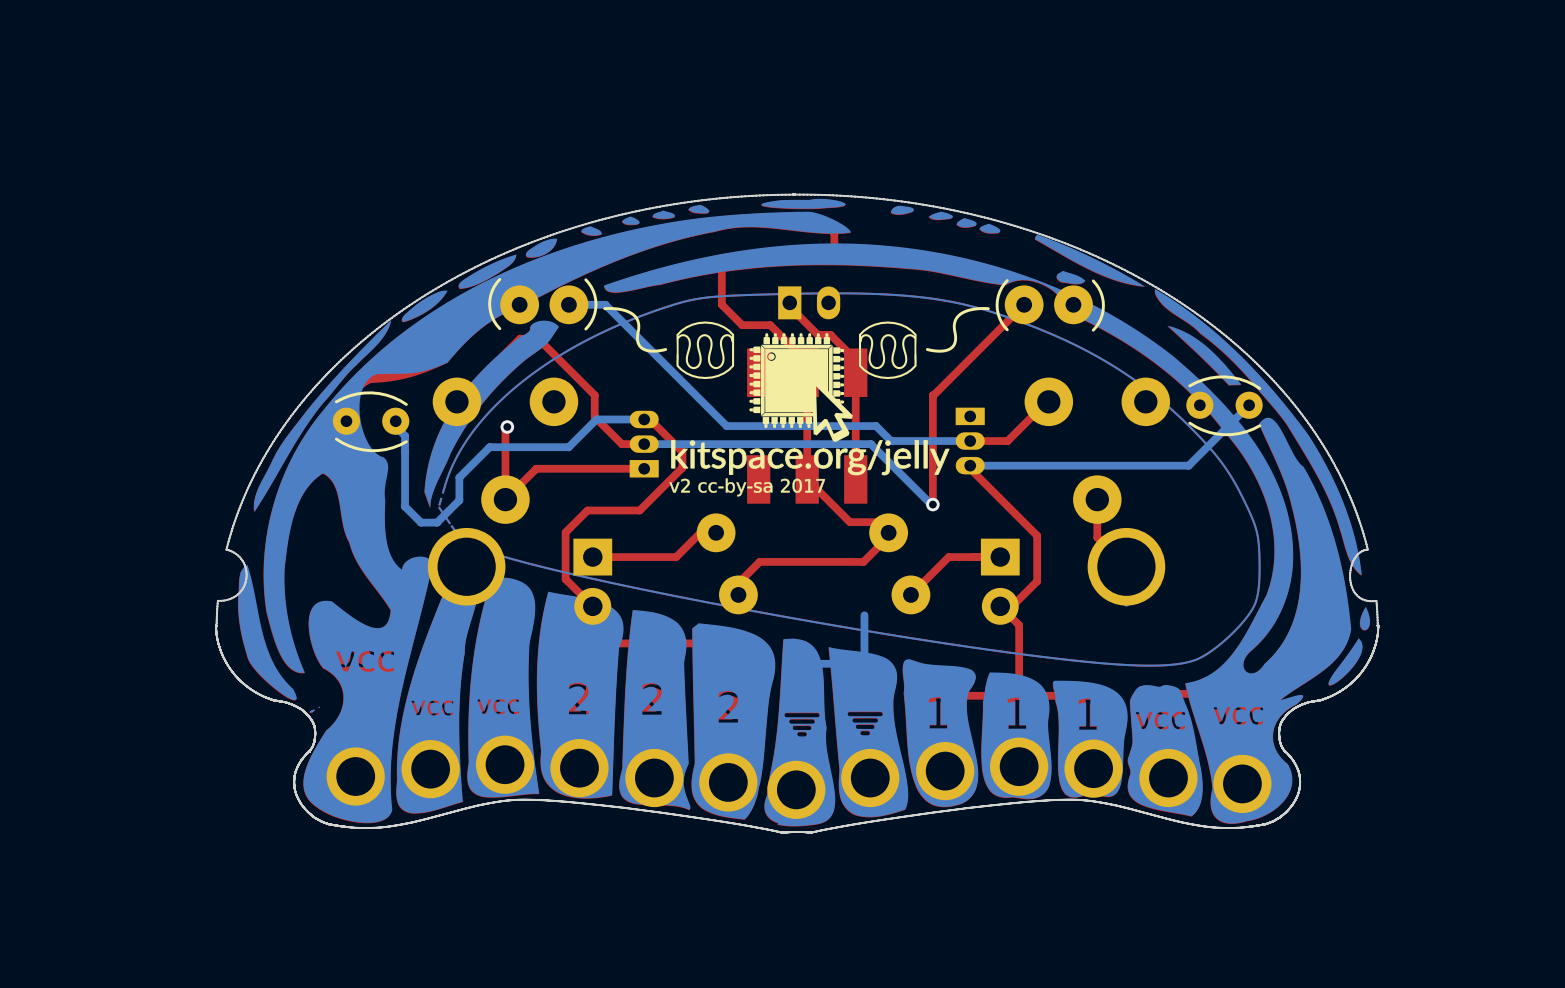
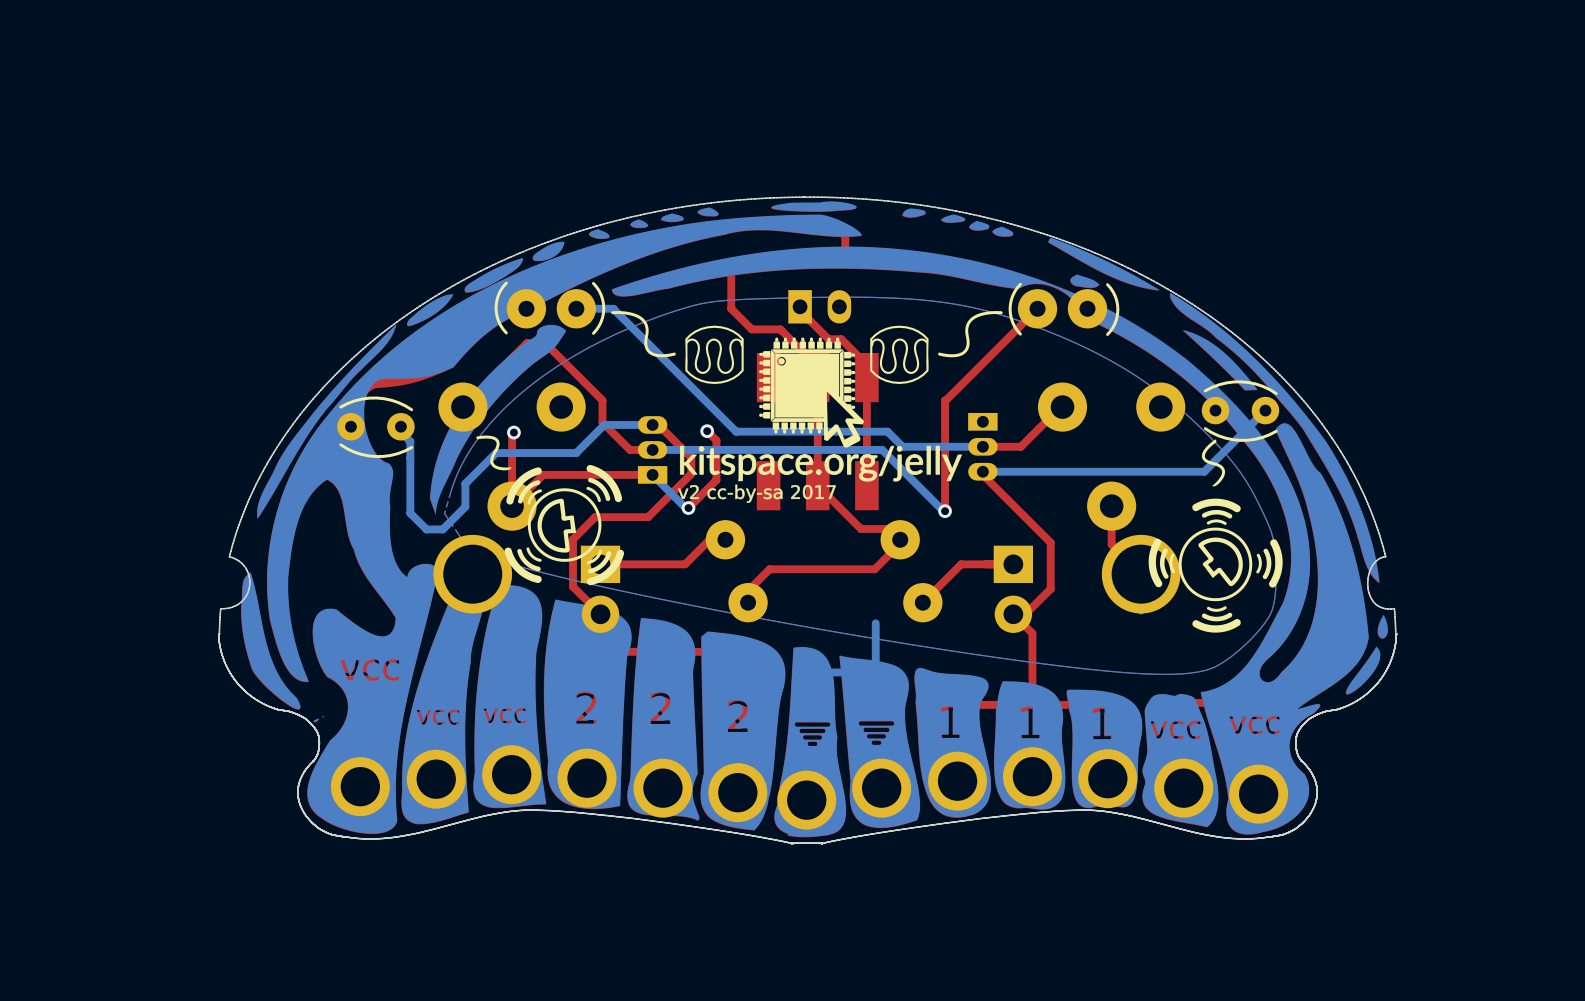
top track: none -> (707, 431) (716, 440) (716, 480) (687, 508)
via: none -> (707, 431)
drawing: none -> [475, 435, 625, 586]
drawing: none -> [1148, 439, 1283, 633]
bottom track: none -> (652, 474) (685, 508) (688, 508)
via: none -> (688, 508)

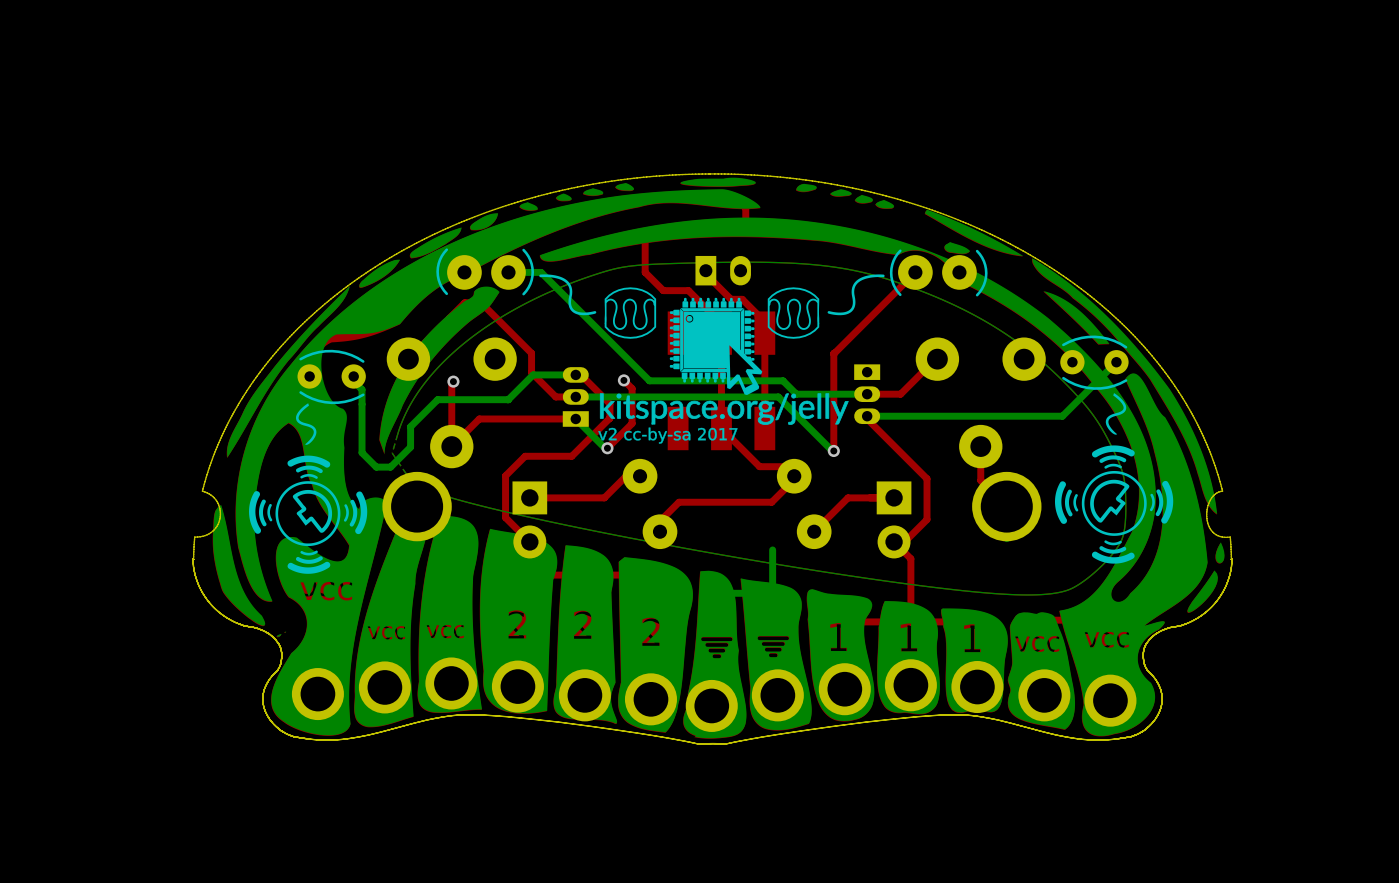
drawing: [475, 435, 625, 586] -> none
drawing: [1148, 439, 1283, 633] -> none
drawing: none -> [1054, 393, 1174, 564]
drawing: none -> [248, 403, 368, 574]

